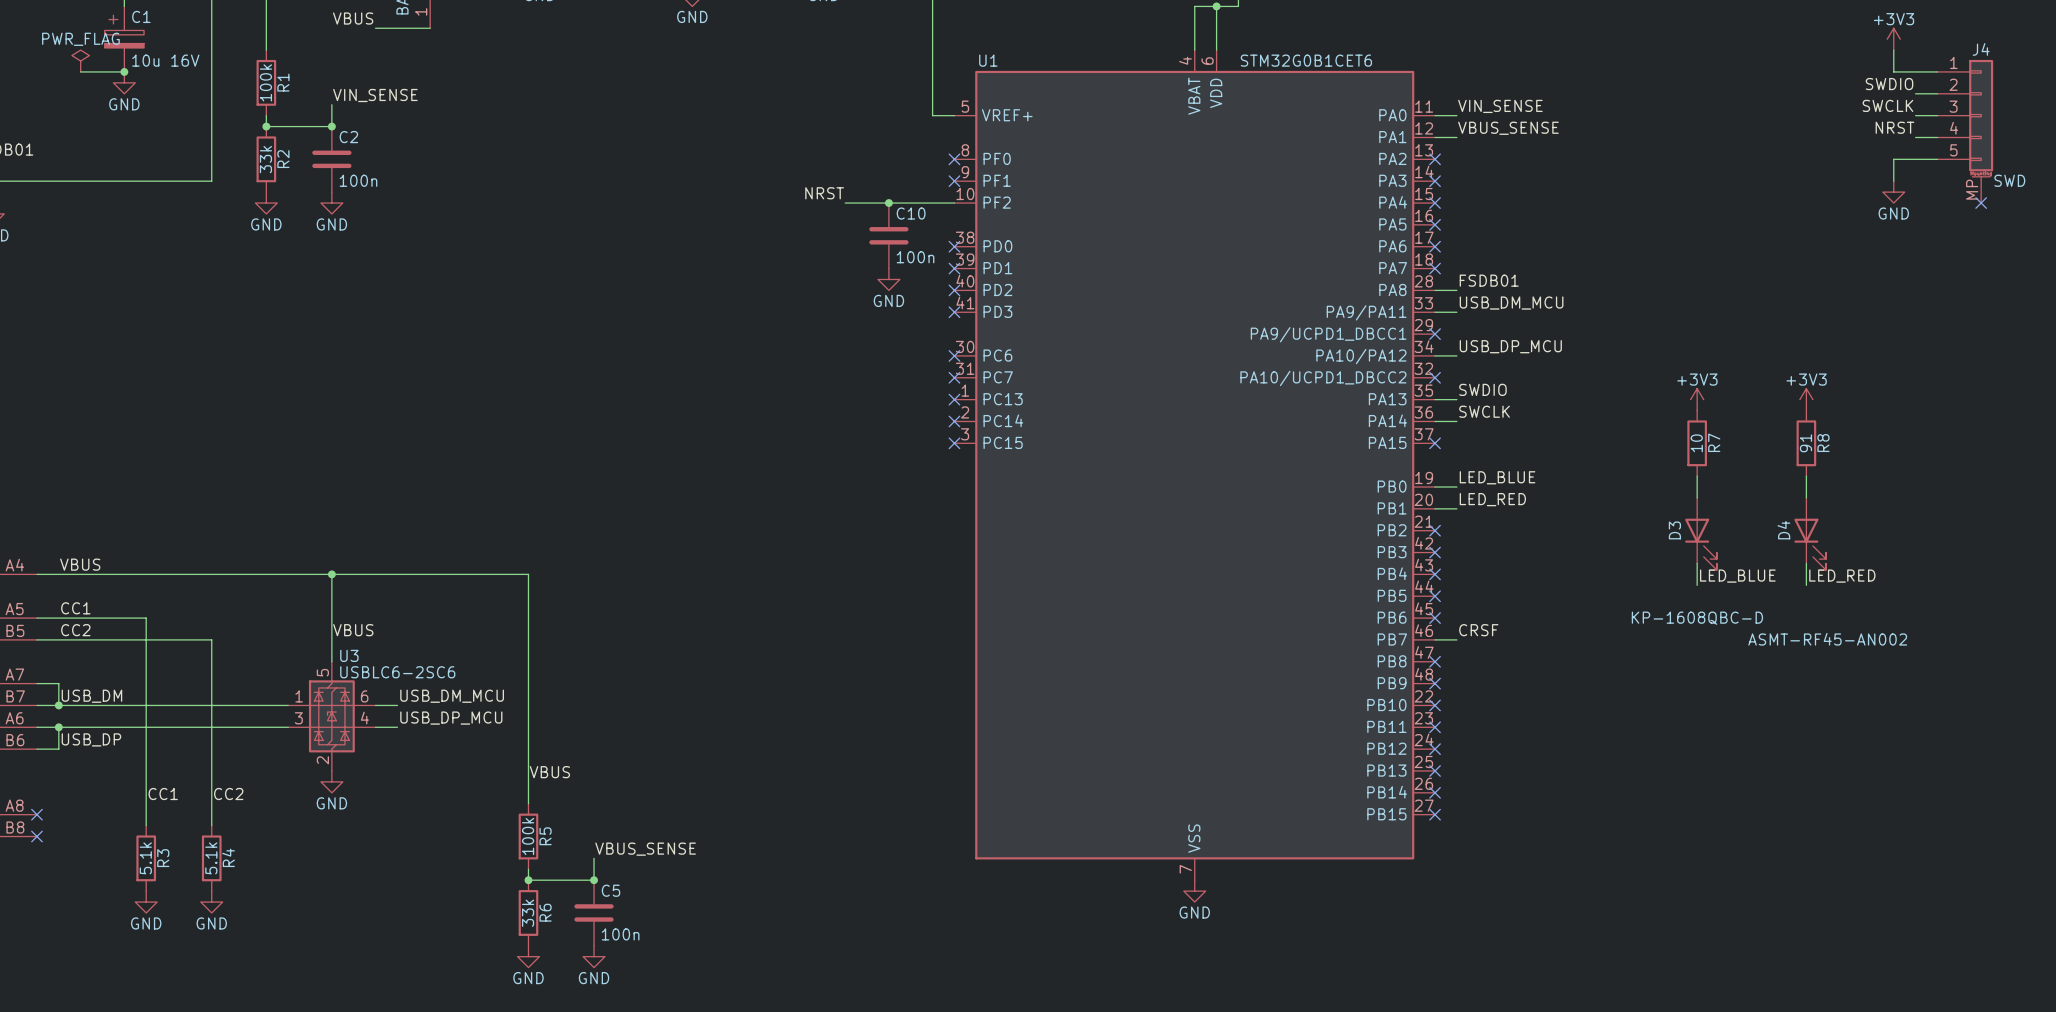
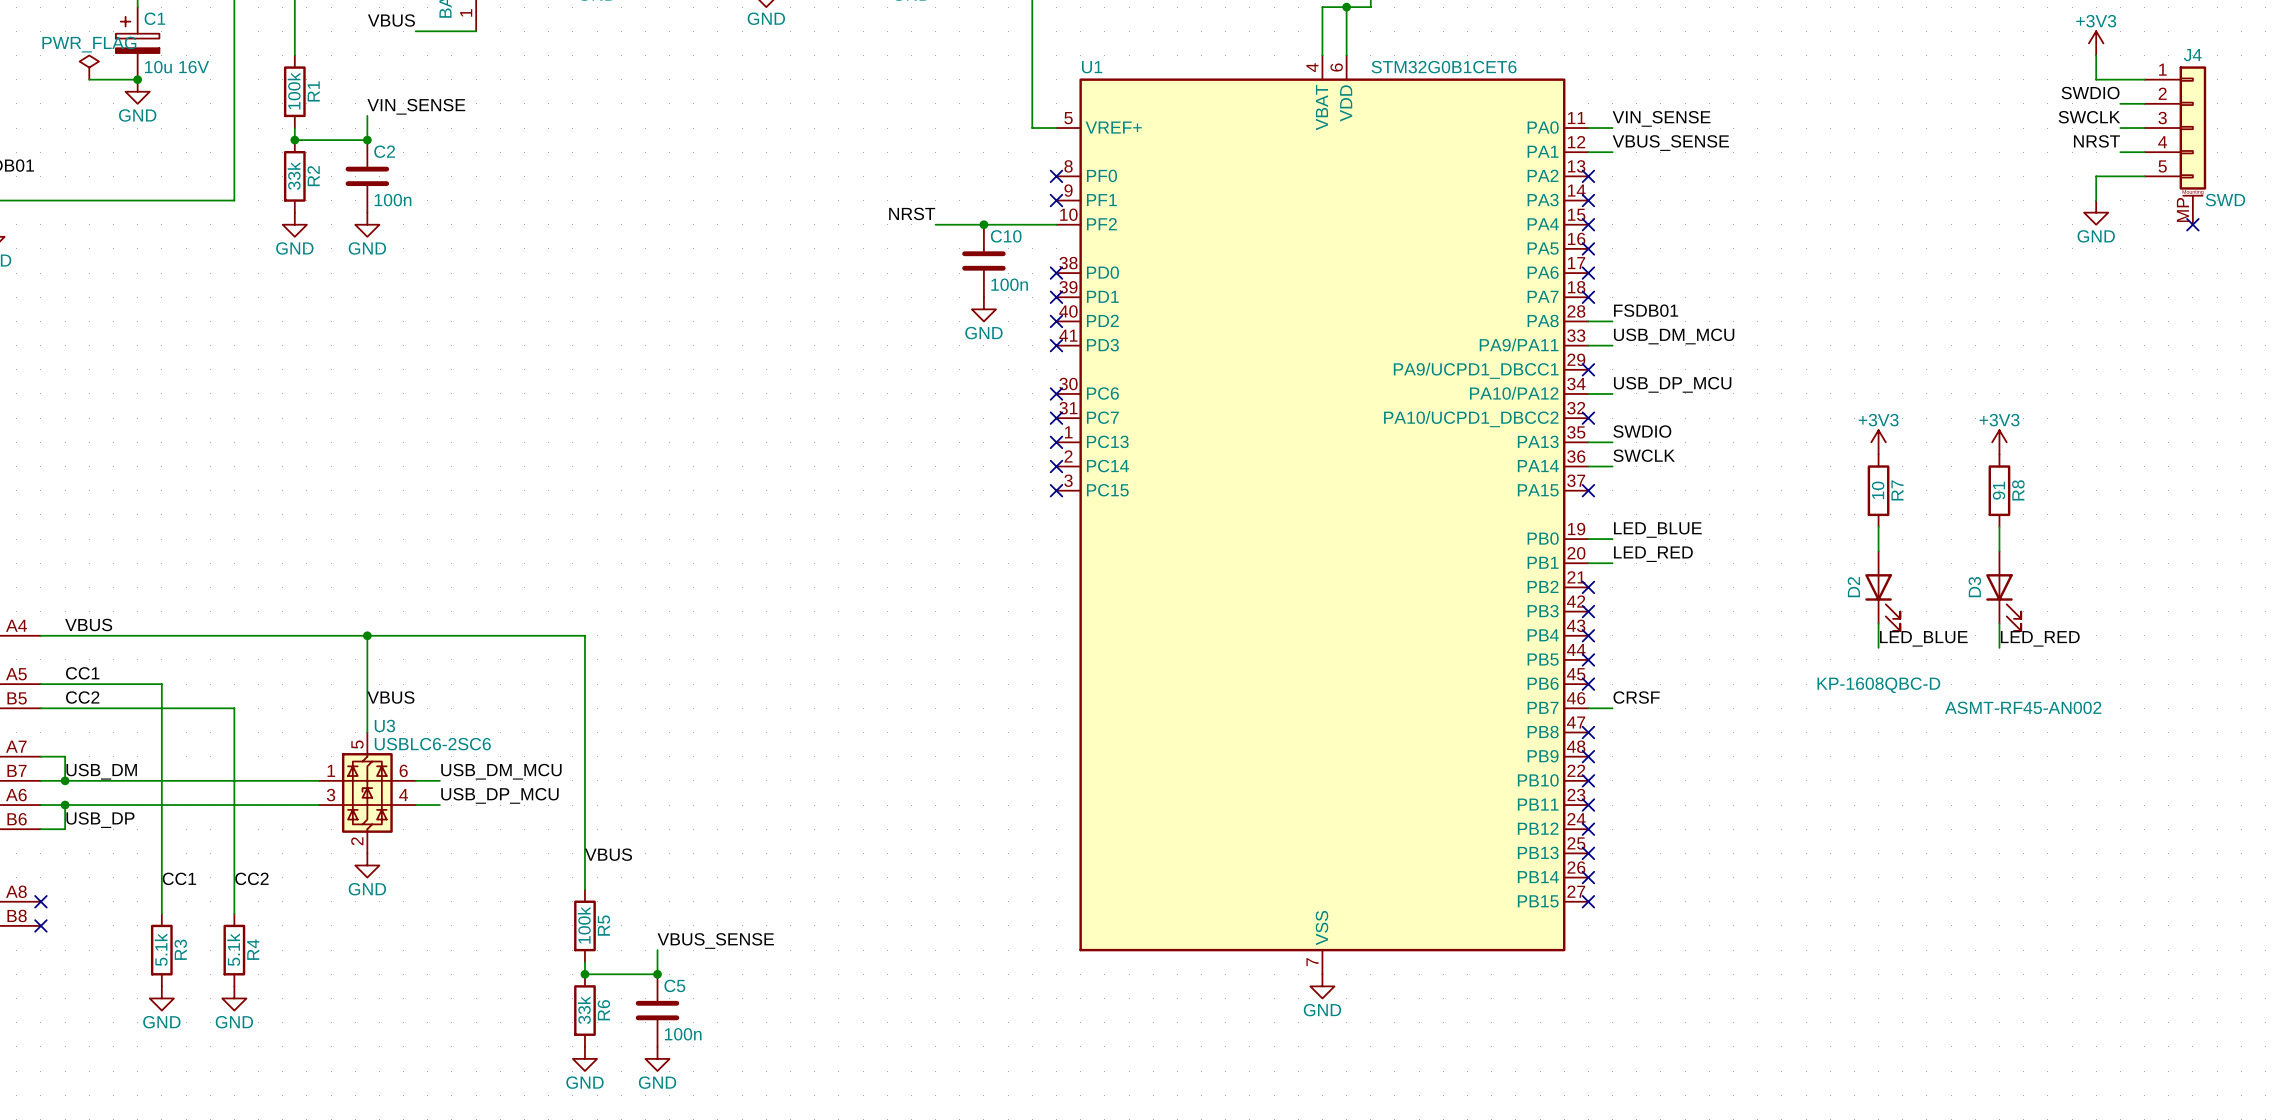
D3 name: D3 (1674, 530) -> D2 (1853, 587)
D4 name: D4 (1783, 530) -> D3 (1974, 587)

